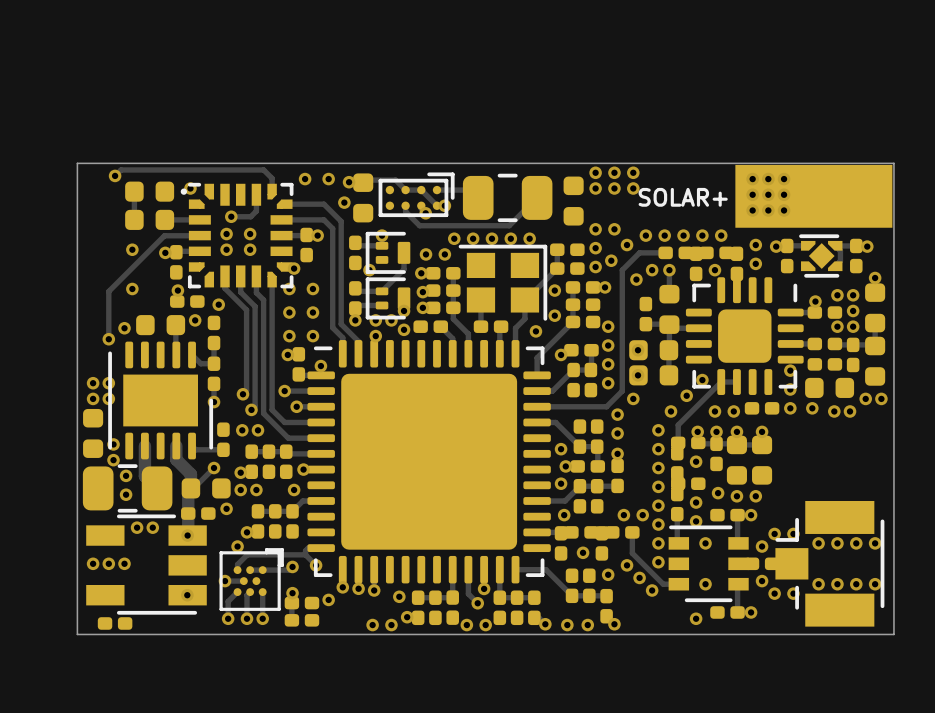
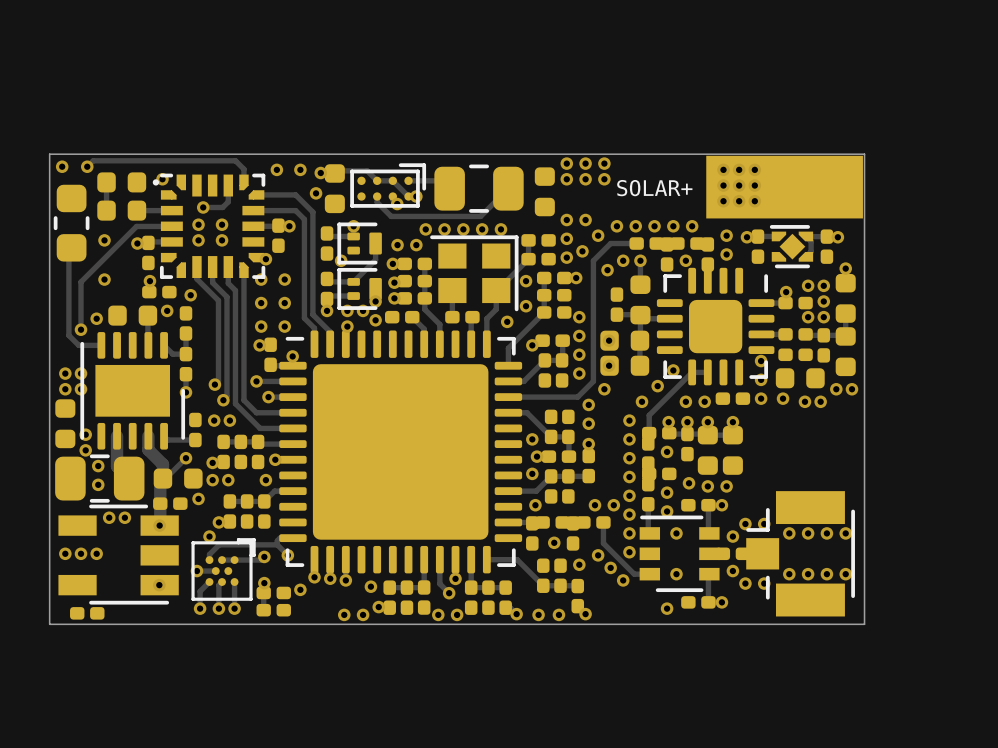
via: none -> (62, 166)
part: none -> (71, 223)
track: none -> (71, 247) (68, 250) (68, 335) (78, 345) (101, 345)

